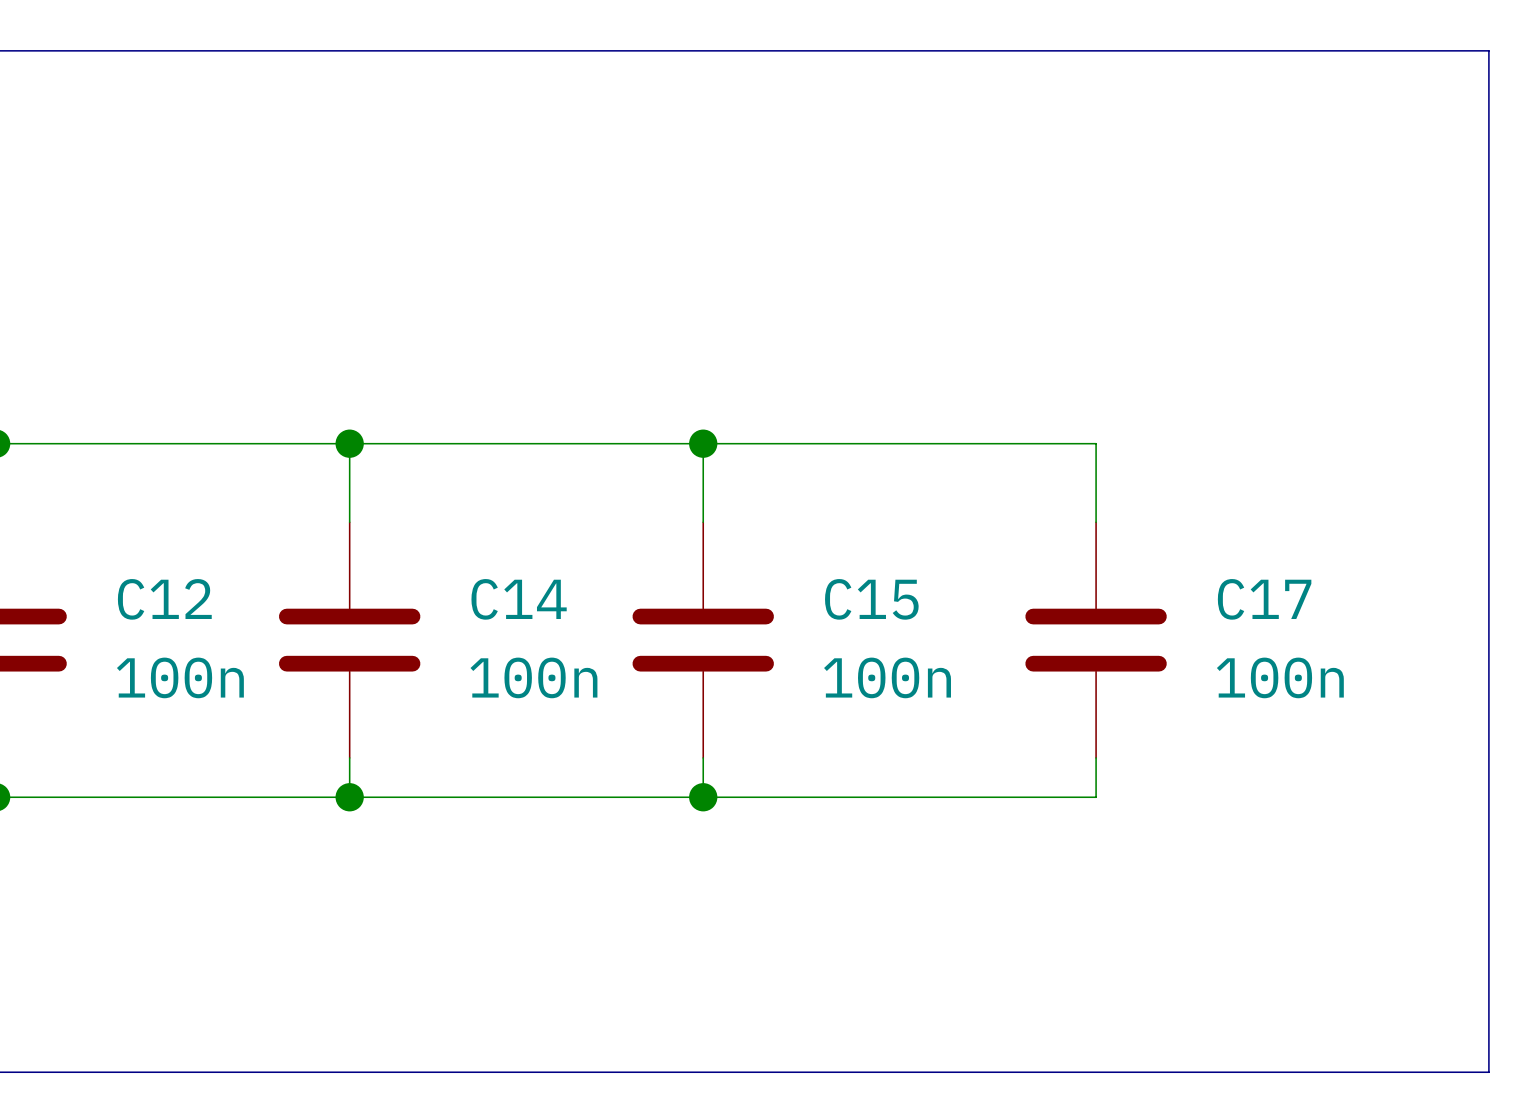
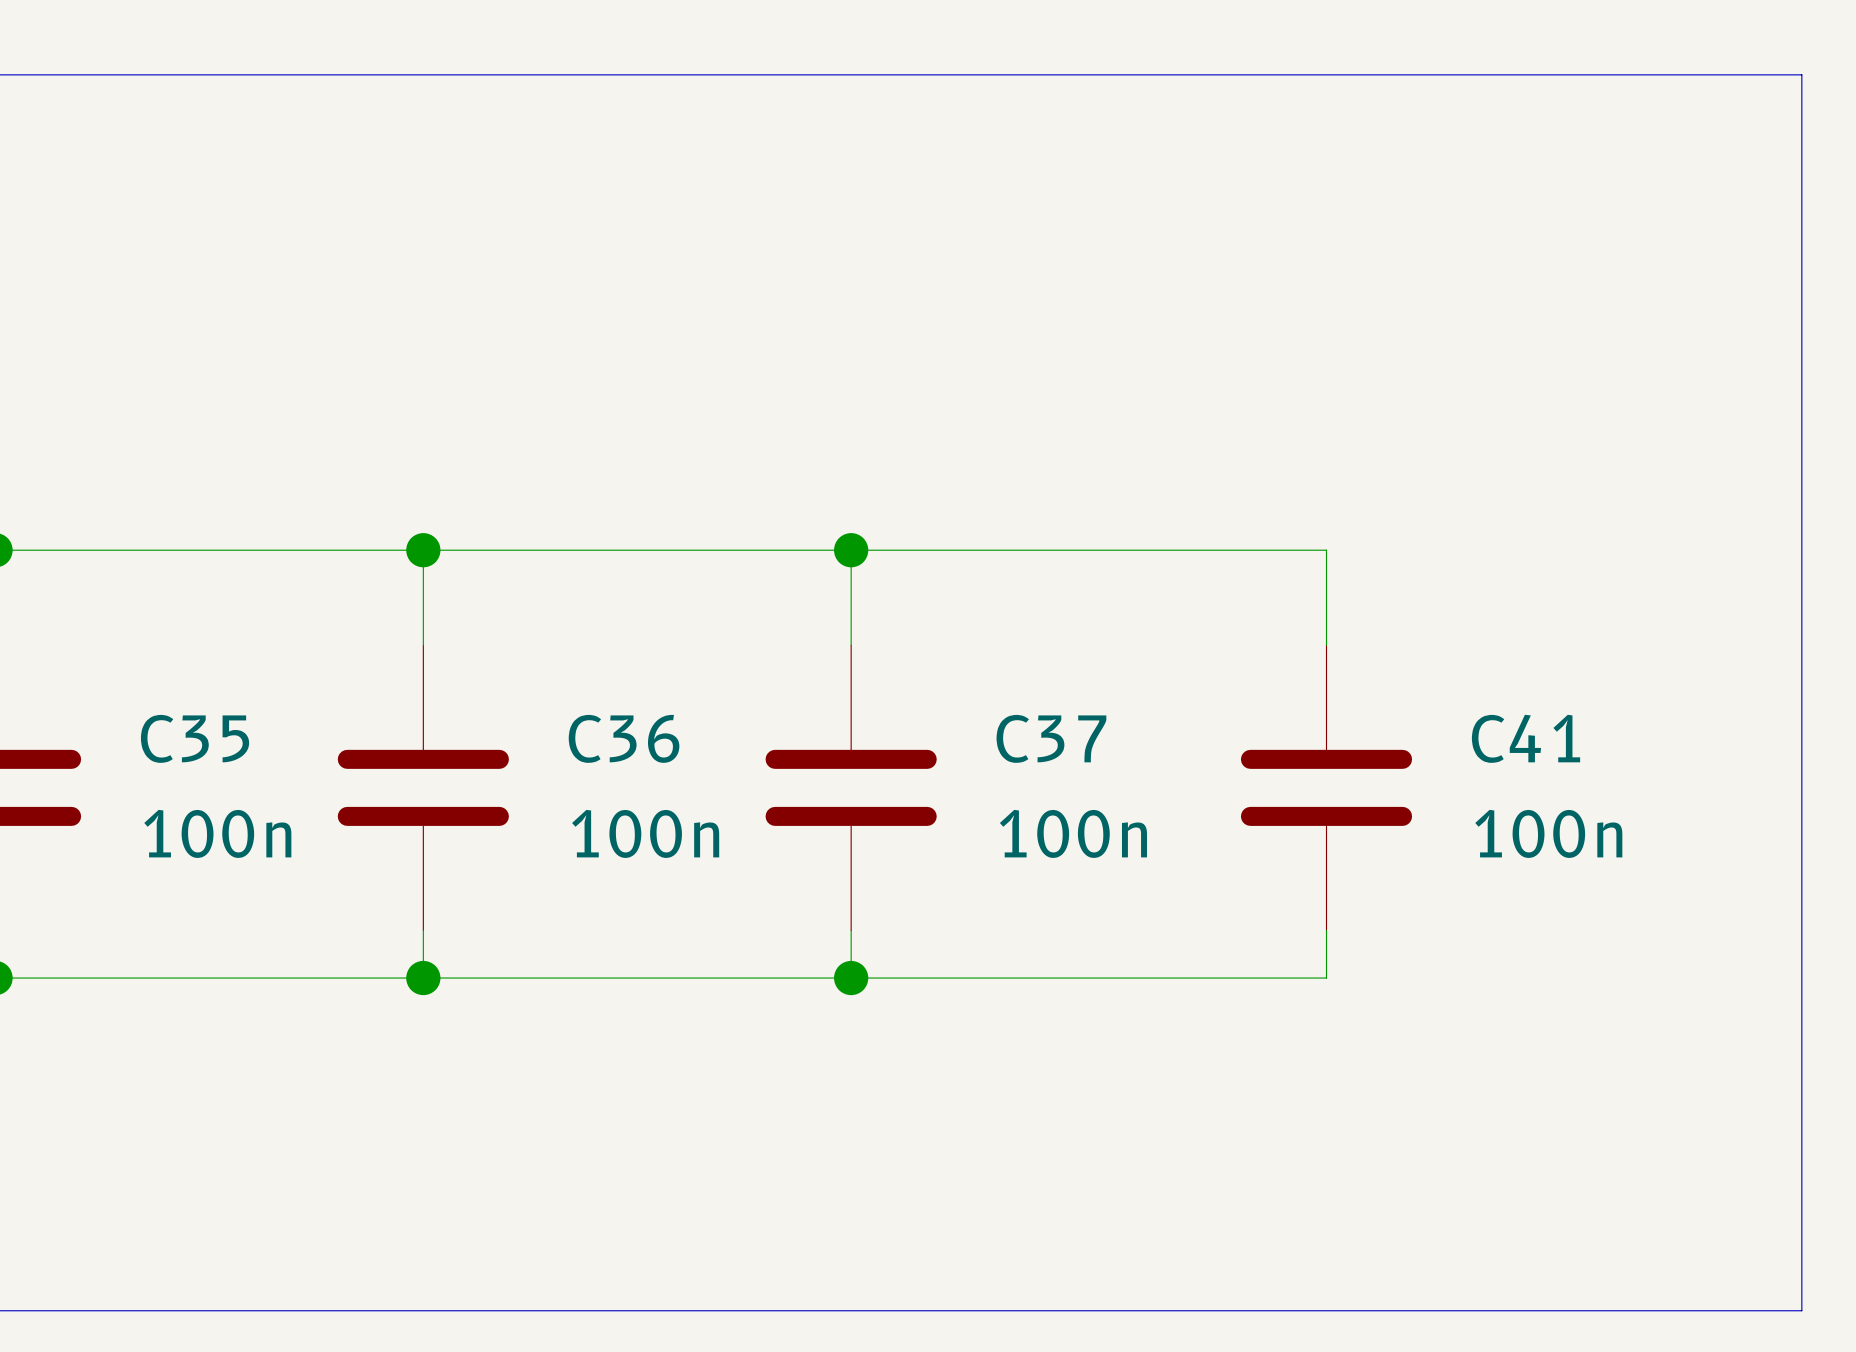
C12 name: C12 (164, 599) -> C35 (195, 738)
C14 name: C14 (519, 599) -> C36 (624, 738)
C15 name: C15 (871, 599) -> C37 (1051, 738)
C17 name: C17 (1264, 599) -> C41 (1526, 738)

